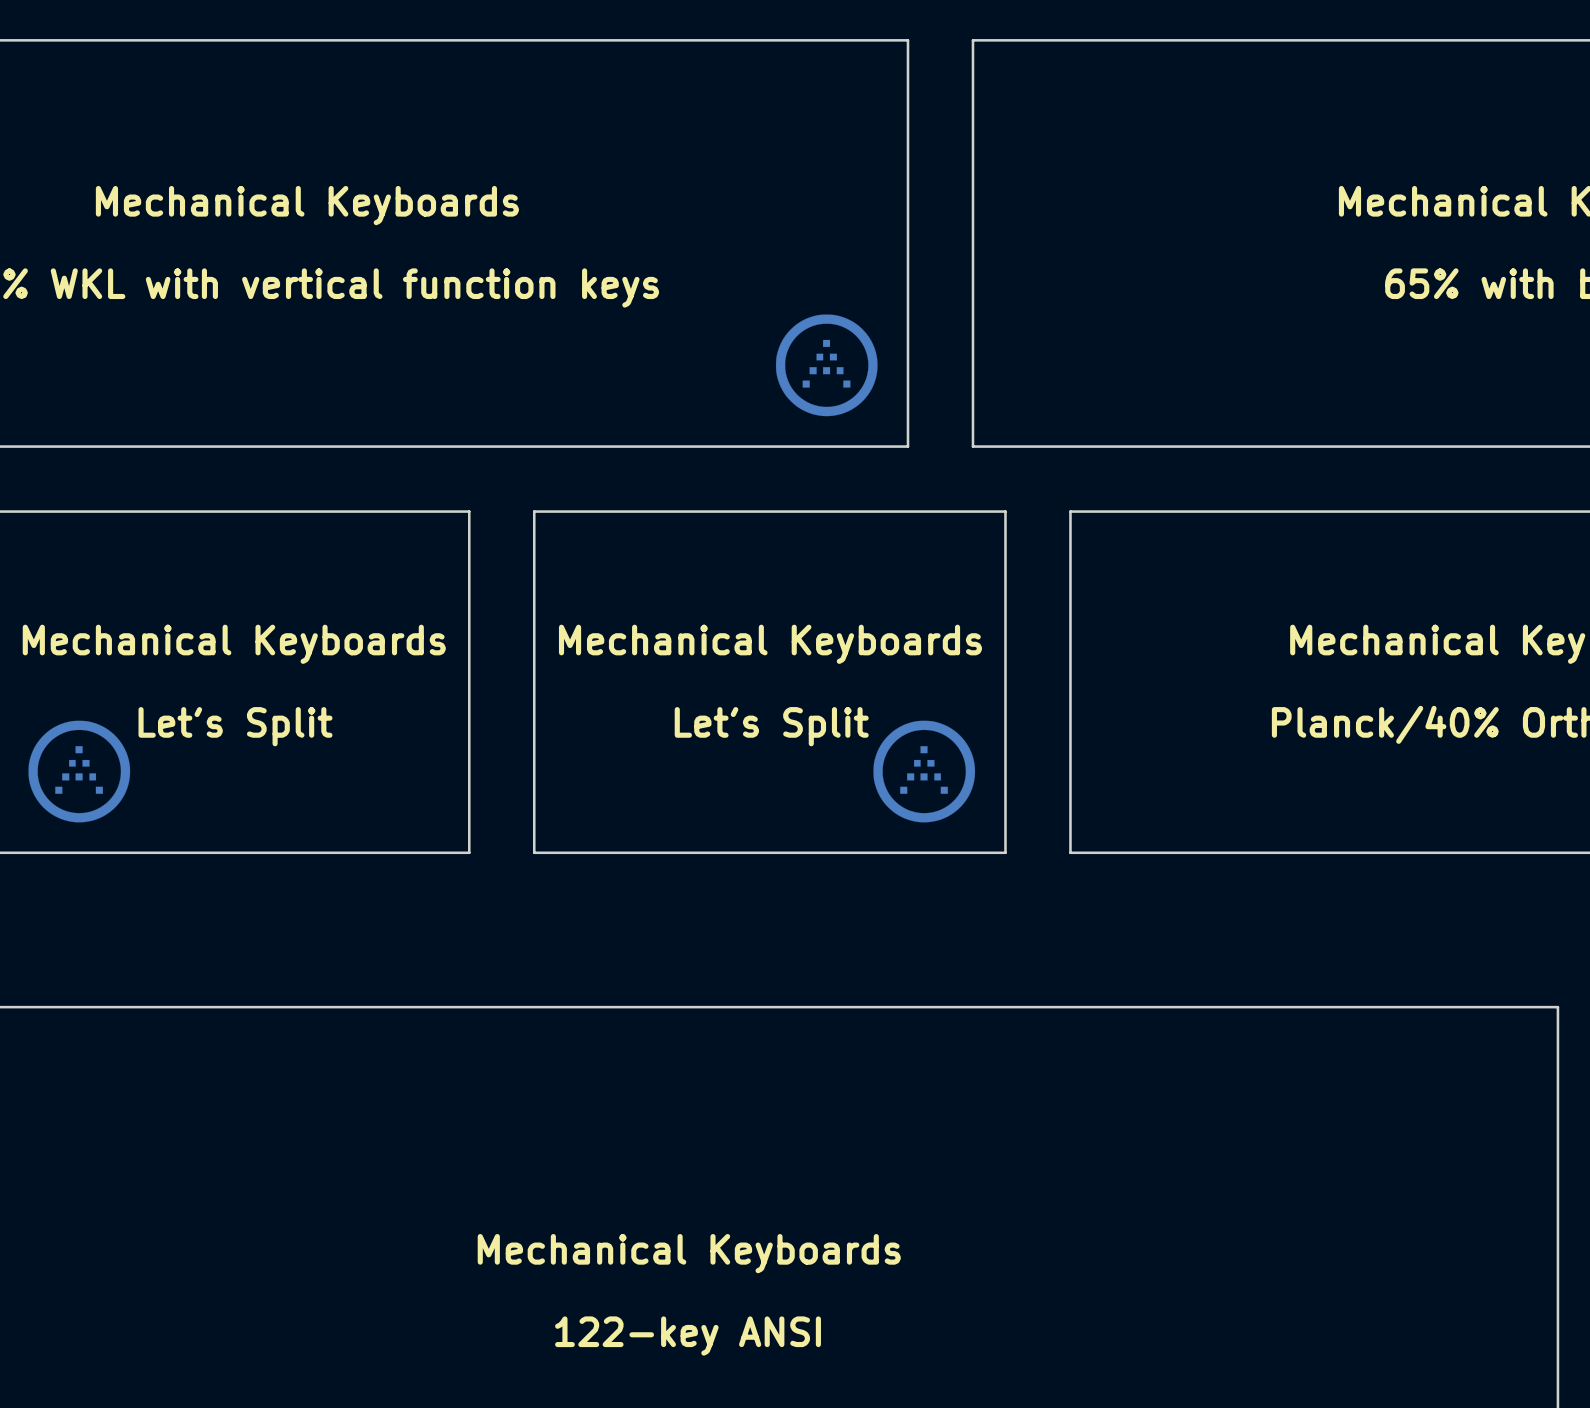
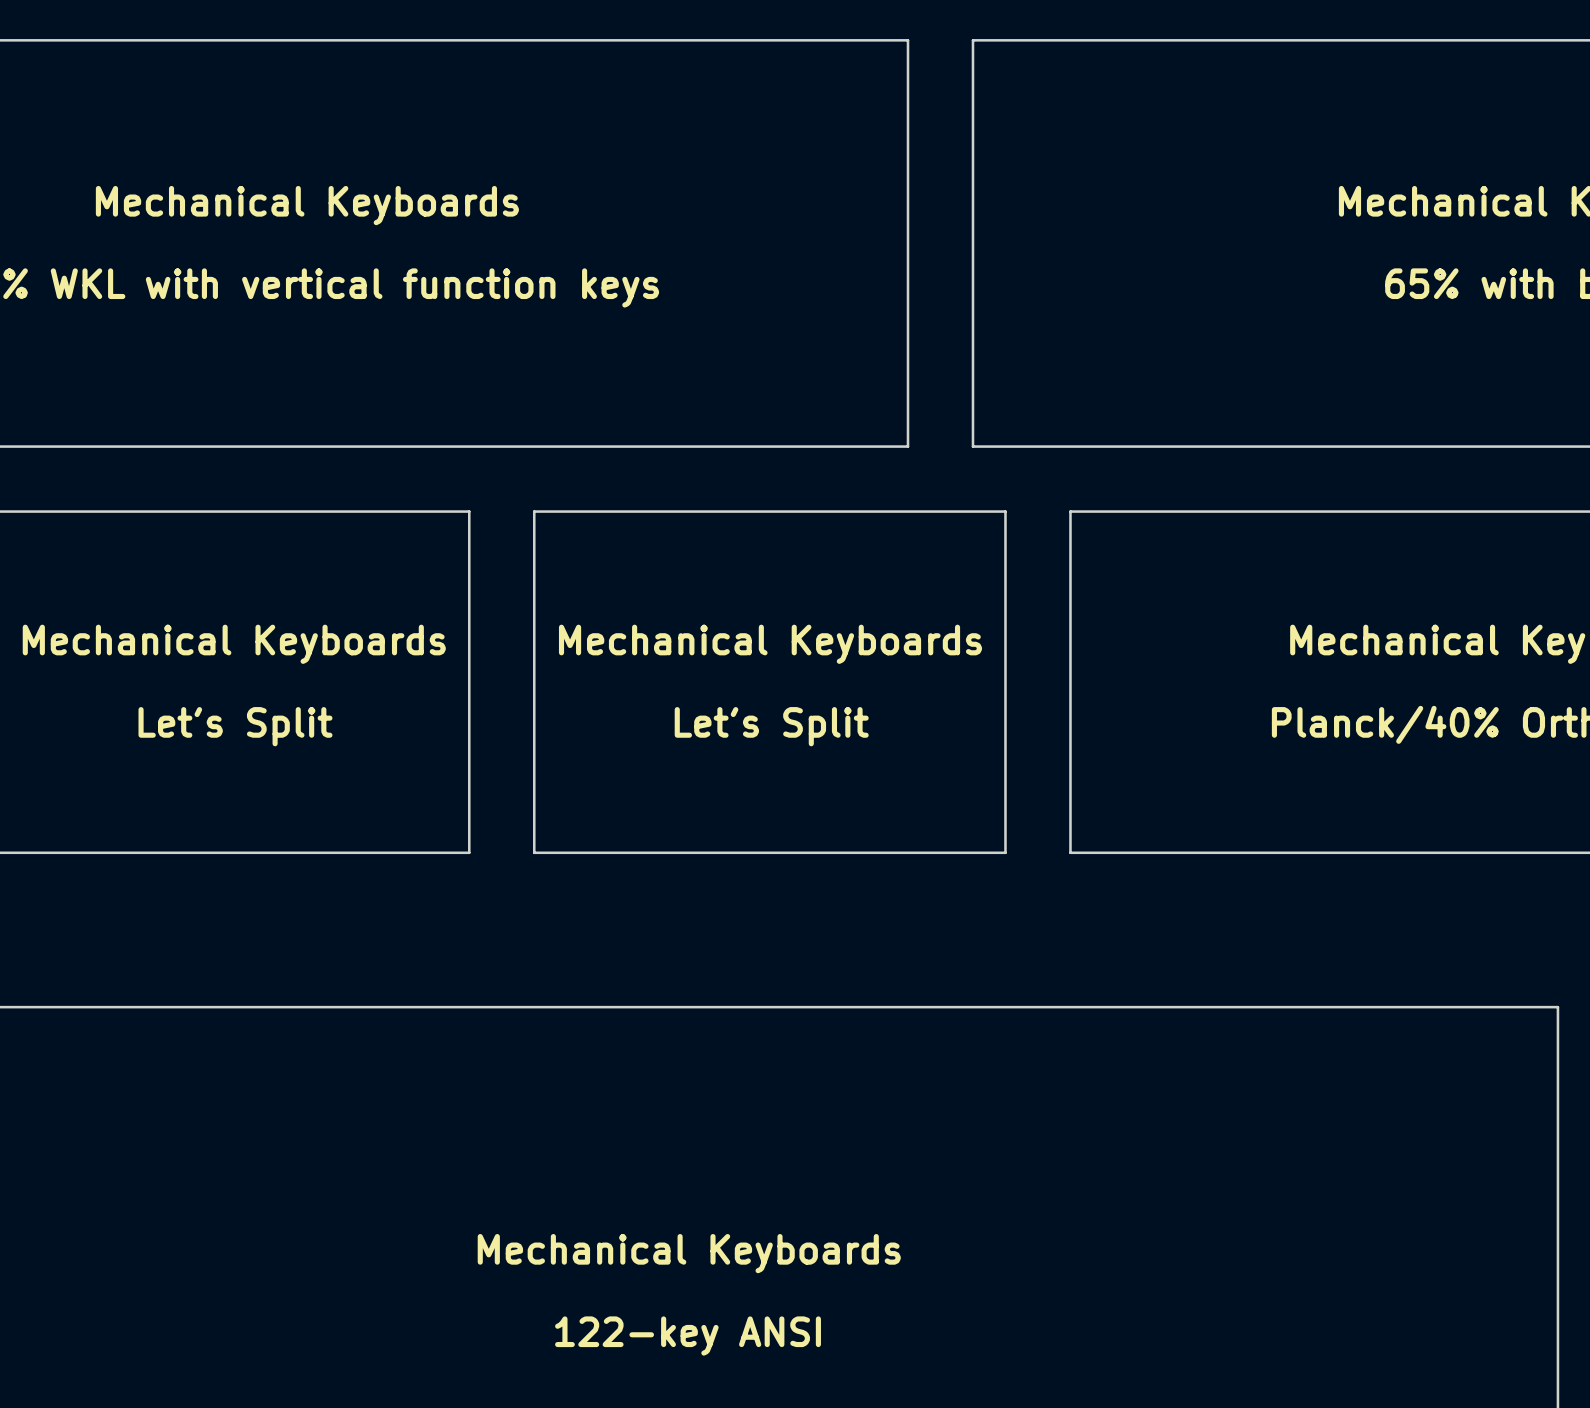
drawing: [775, 314, 878, 417] -> none
drawing: [28, 720, 131, 823] -> none
drawing: [873, 720, 976, 823] -> none

